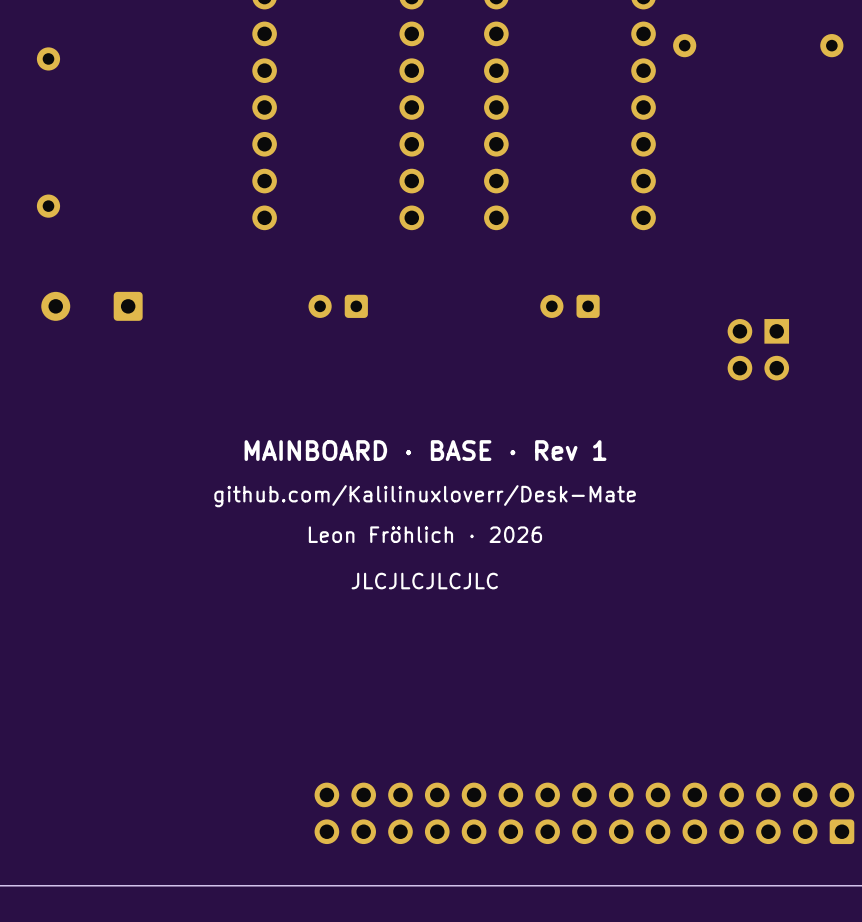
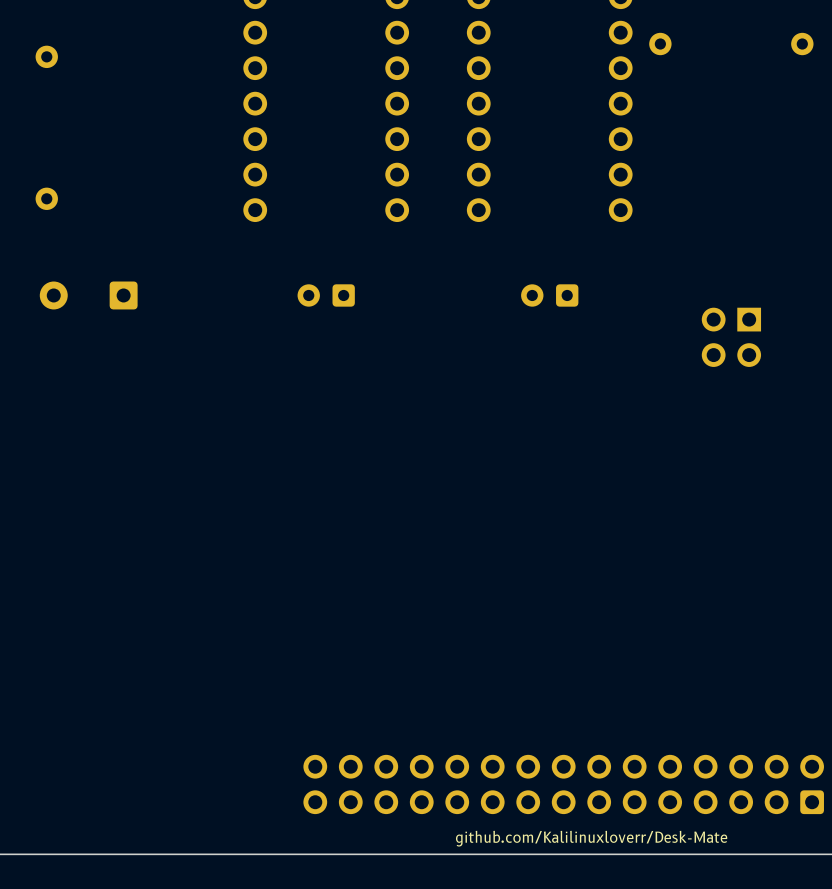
text: MAINBOARD · BASE · Rev 1 (425, 450) -> none
text: github.com/Kalilinuxloverr/Desk-Mate (425, 496) -> none
text: Leon Fröhlich · 2026 (425, 534) -> none
text: JLCJLCJLCJLC (424, 581) -> none
text: none -> github.com/Kalilinuxloverr/Desk-Mate (591, 838)

